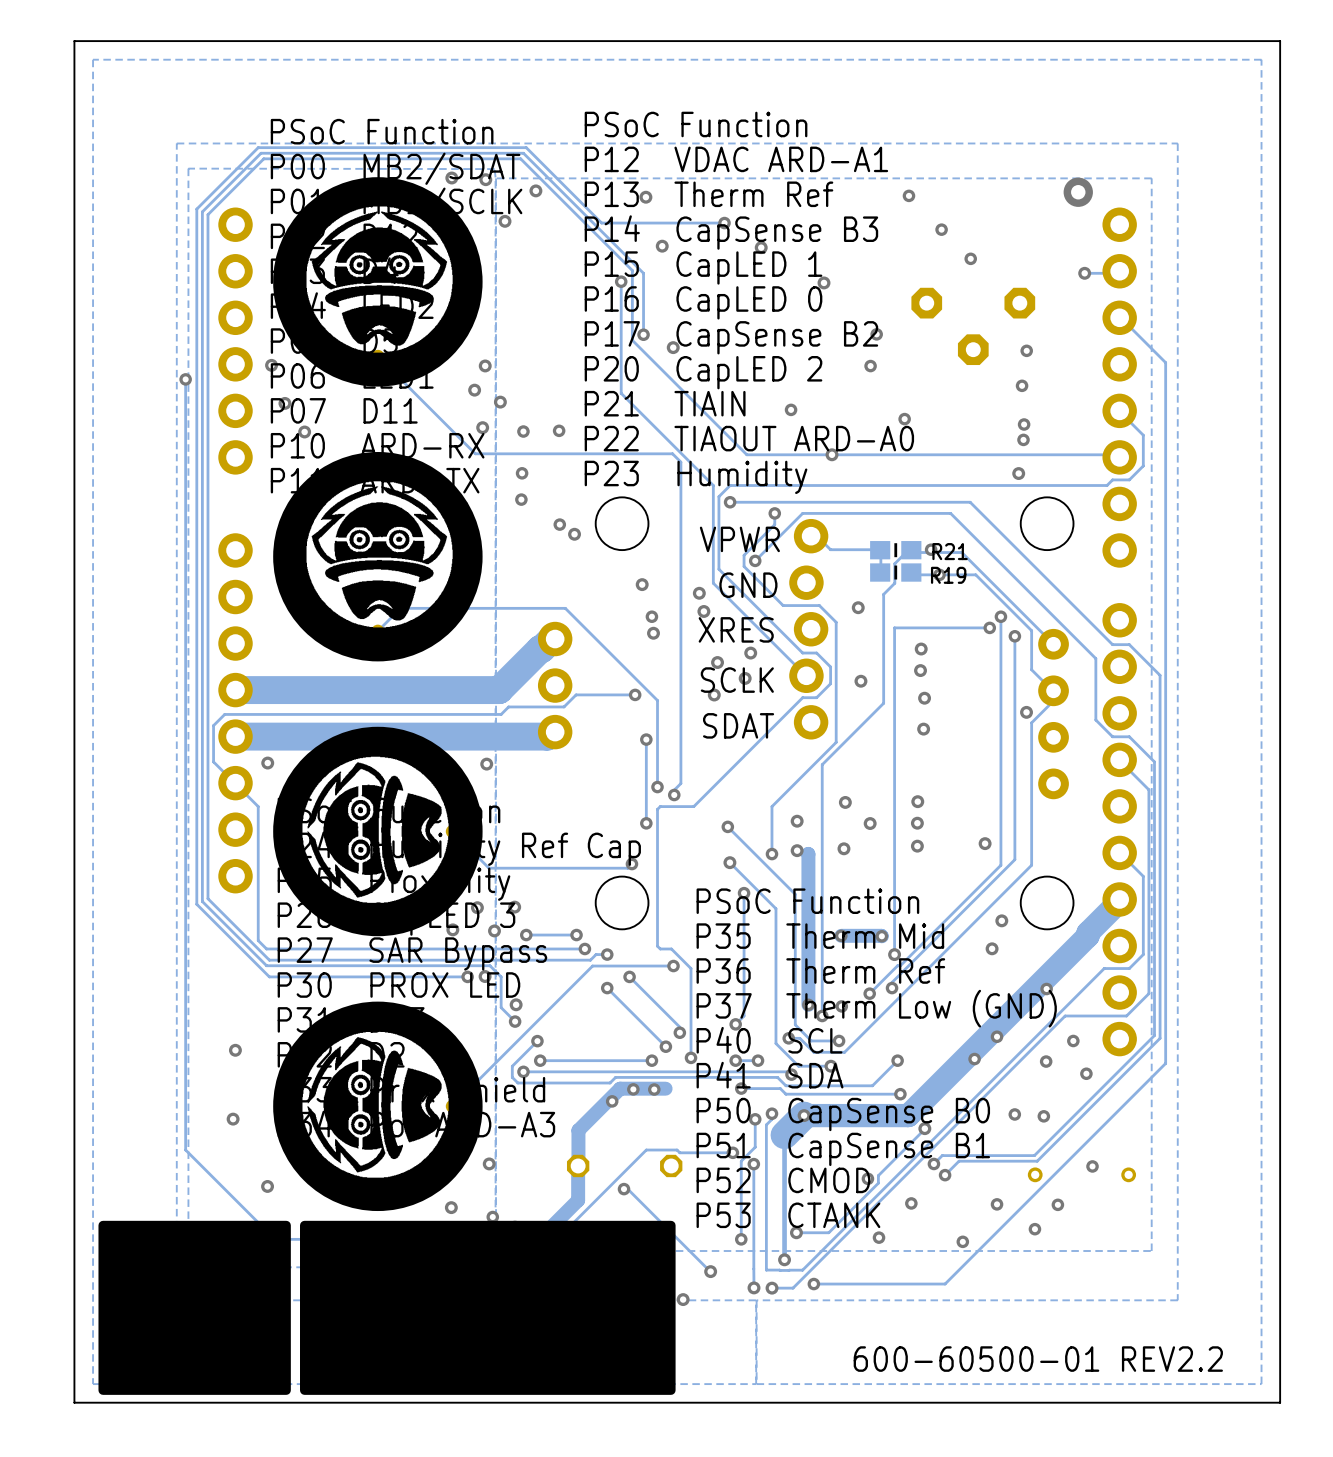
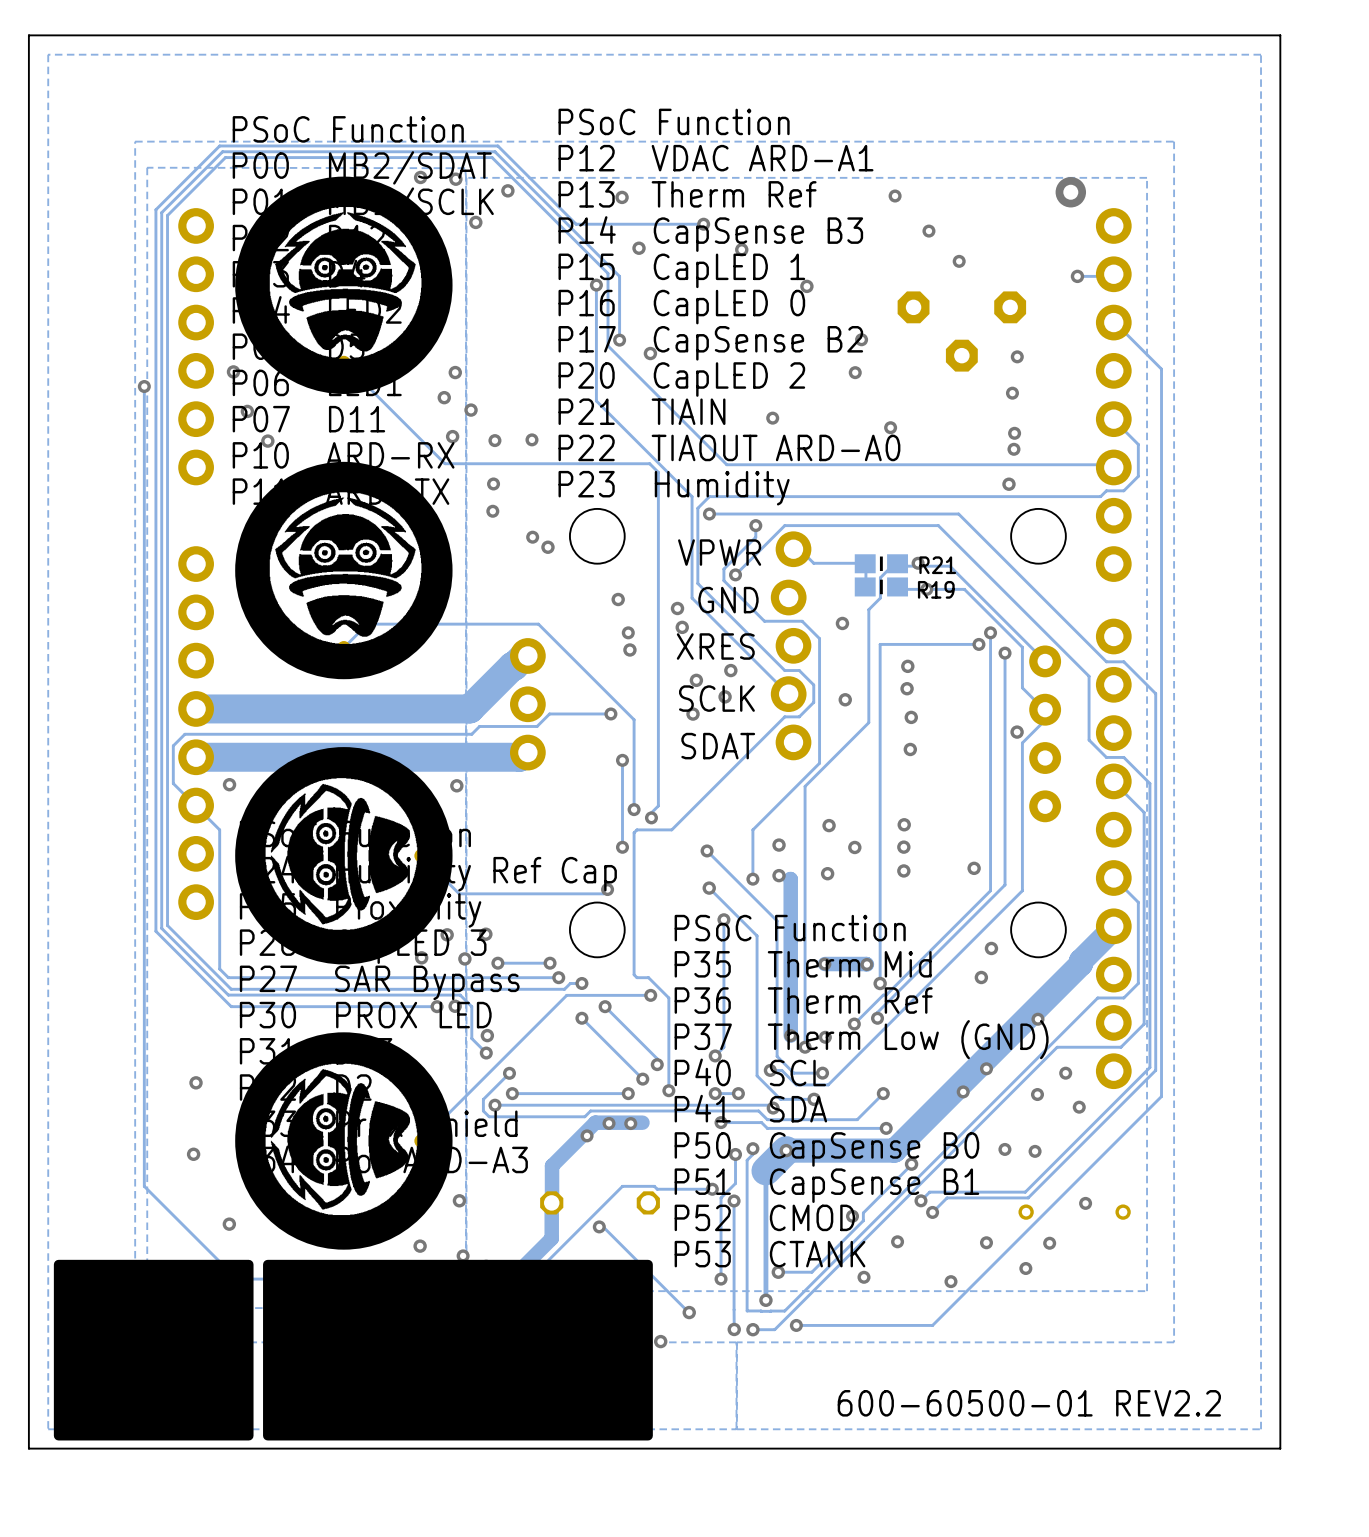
via: (832, 454) -> none

